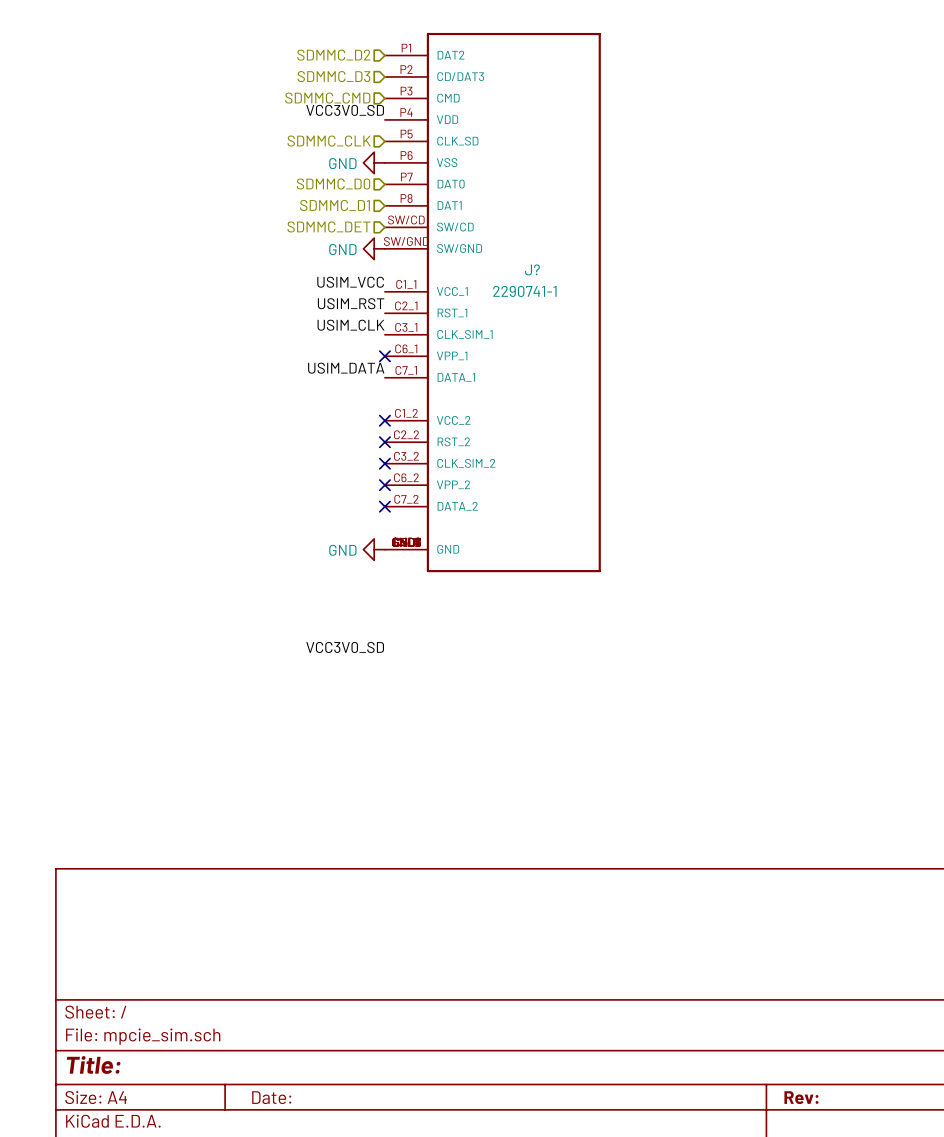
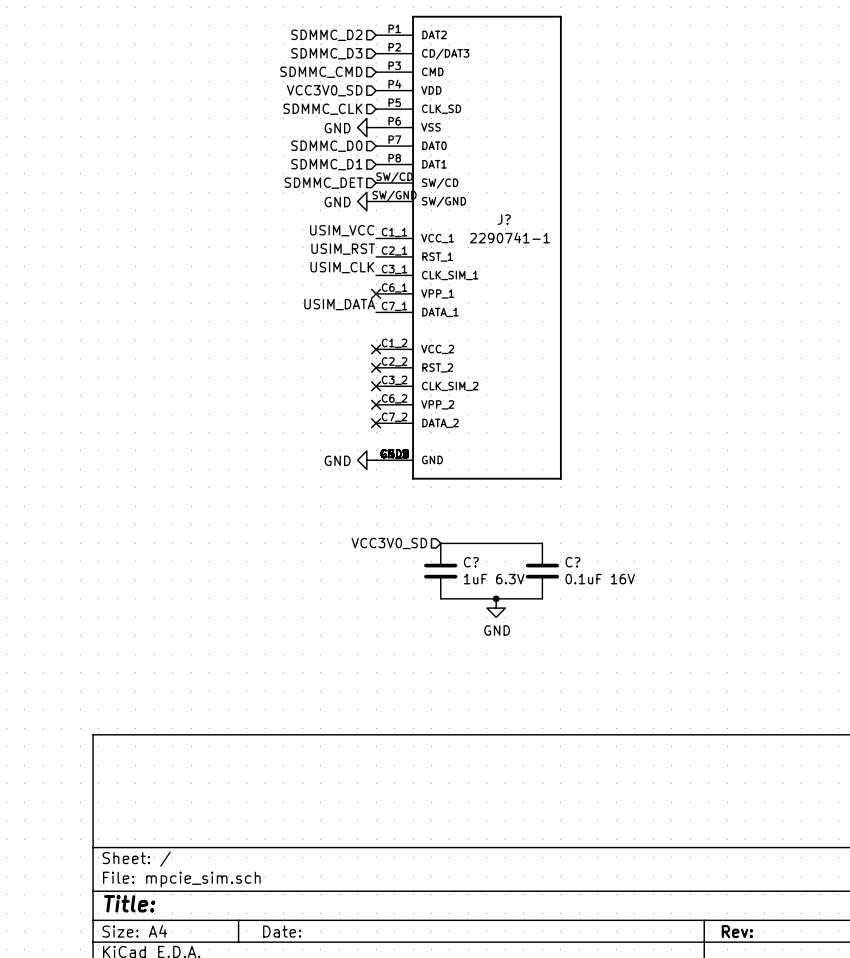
label: VCC3V0_SD (345, 110) -> none
hierarchical label: none -> VCC3V0_SD (324, 90)
hierarchical label: none -> VCC3V0_SD (389, 543)
wire: none -> (440, 543) (542, 543)
label: VCC3V0_SD (345, 647) -> none
C?: none -> 1uF 6.3V (440, 571)
C?: none -> 0.1uF 16V (542, 571)
wire: none -> (440, 598) (542, 598)
junction: none -> (496, 598)
power symbol: none -> GND (496, 608)

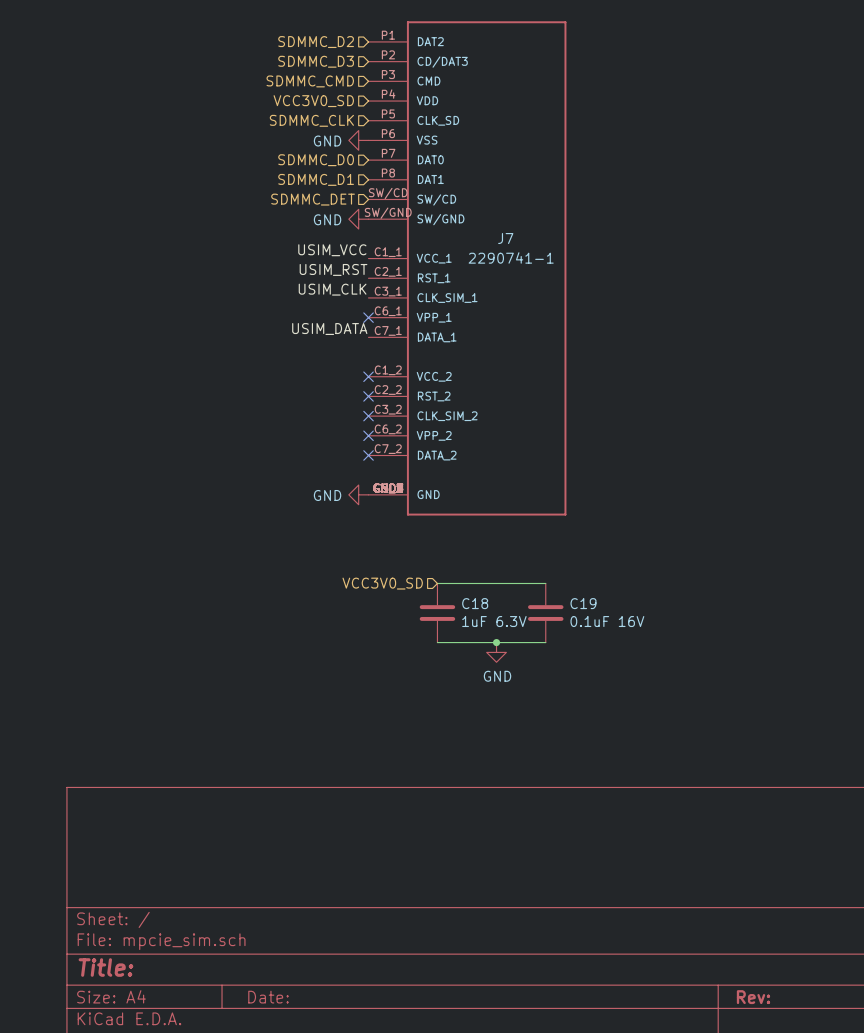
J? name: J? (504, 219) -> J7 (505, 238)
C? name: C? (471, 562) -> C18 (475, 603)
C? name: C? (572, 562) -> C19 (583, 603)

